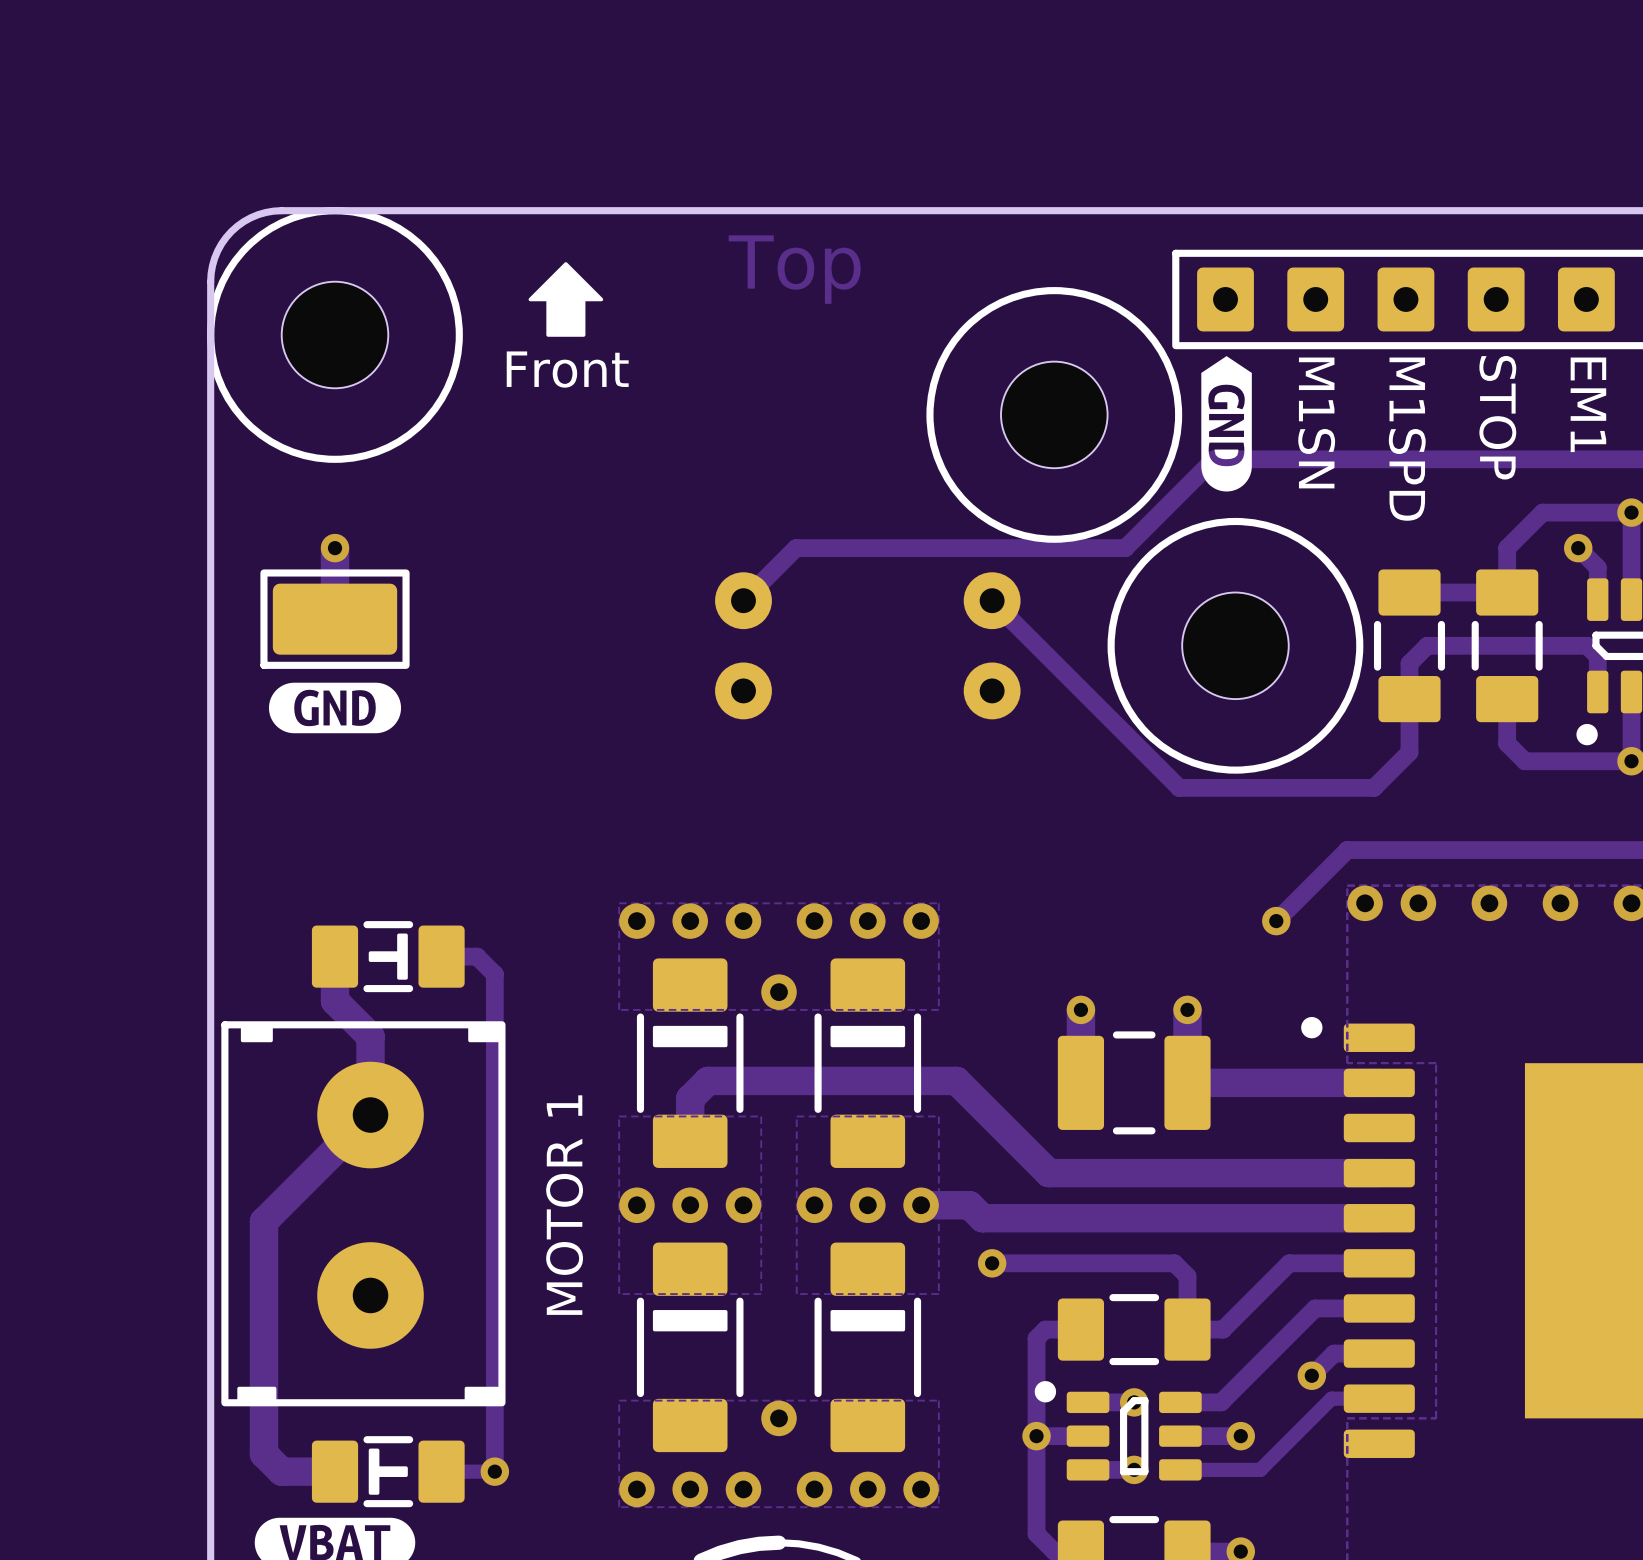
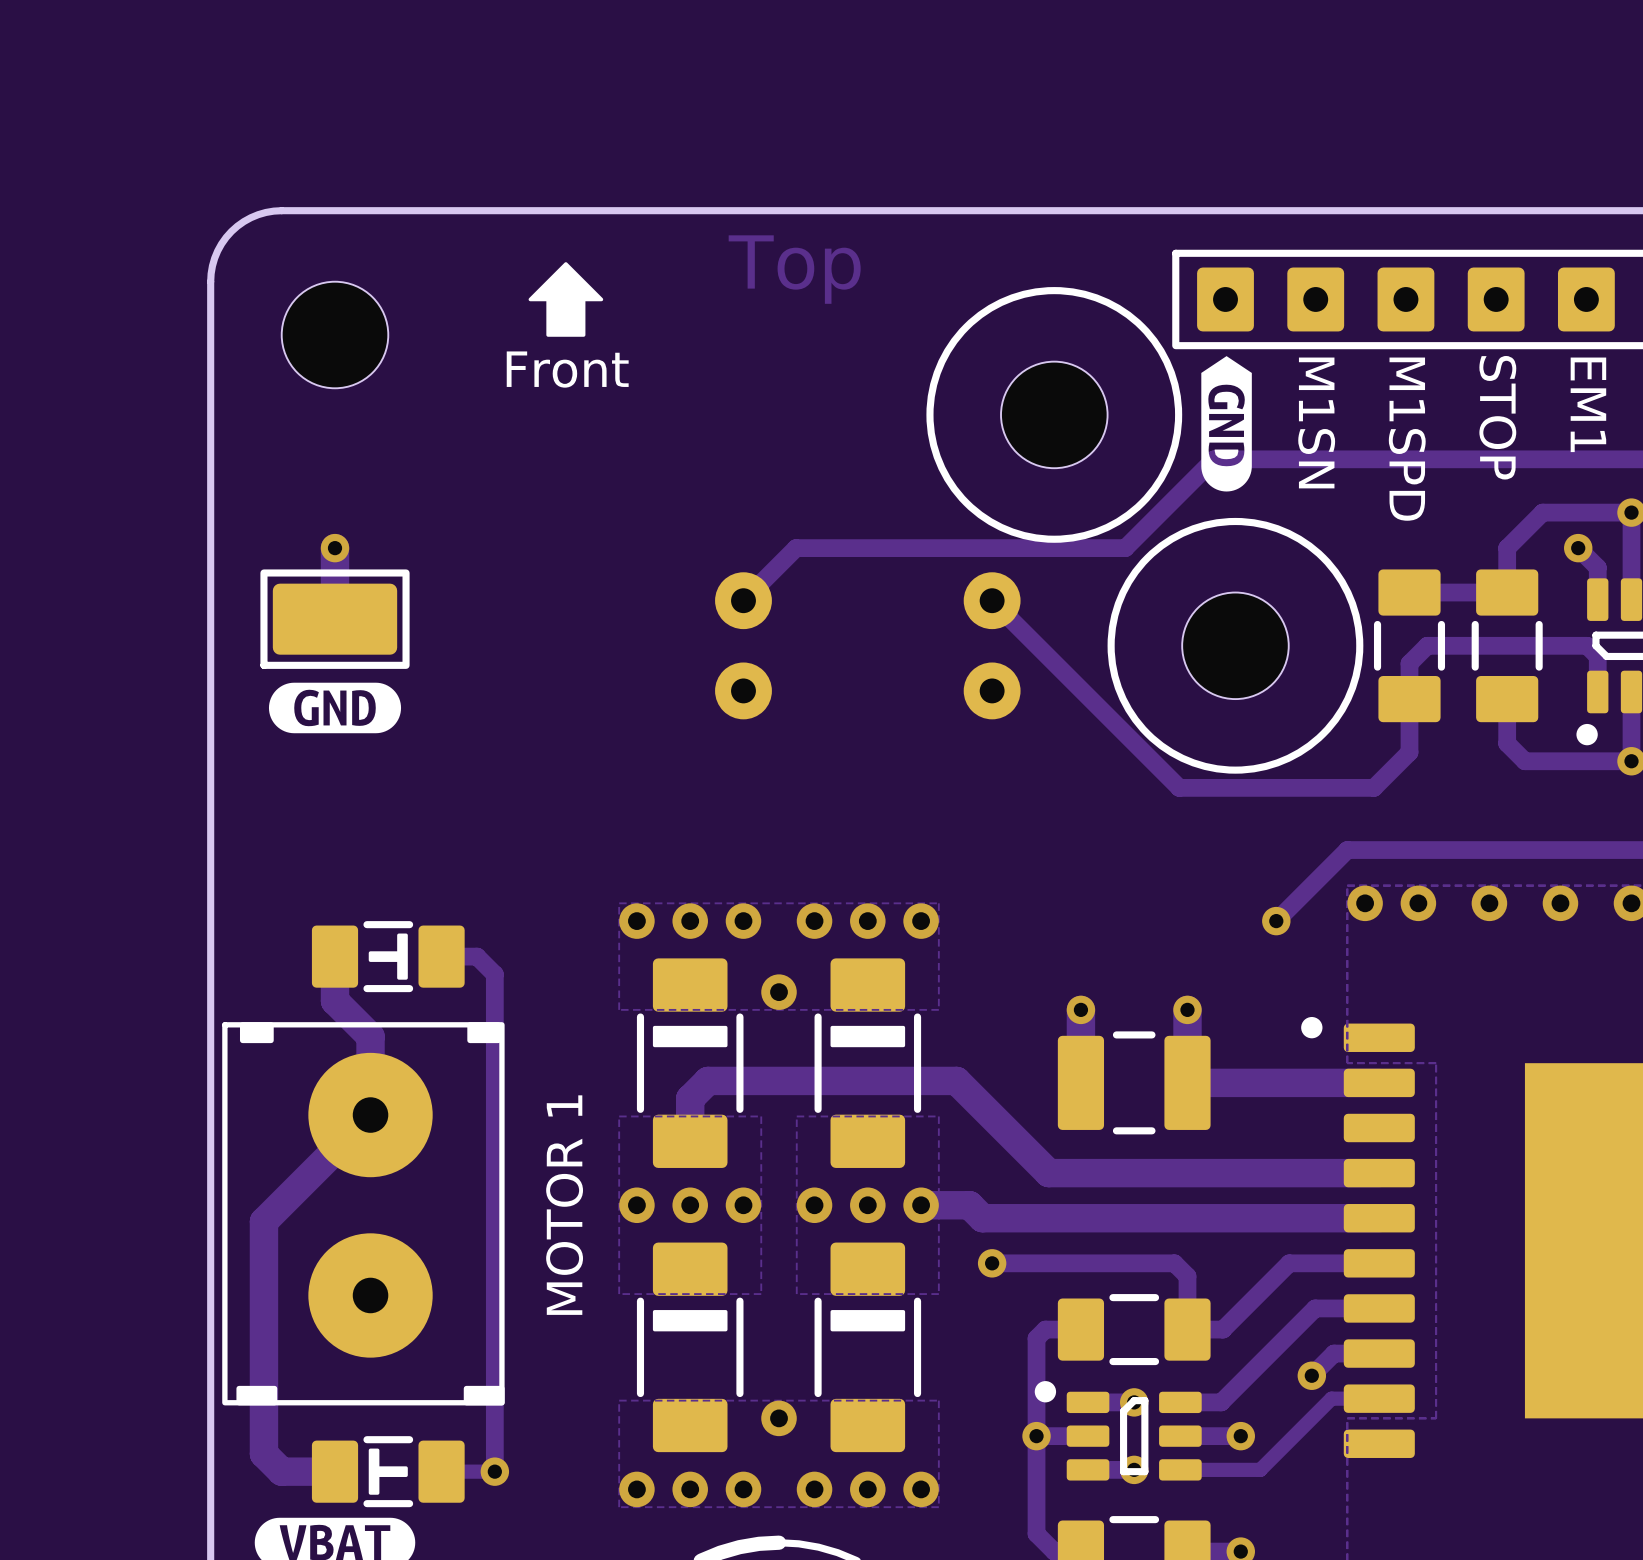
part footprint: [207, 207, 463, 463] -> [281, 281, 389, 389]
part footprint: [221, 1021, 506, 1407] -> [222, 1022, 505, 1406]

